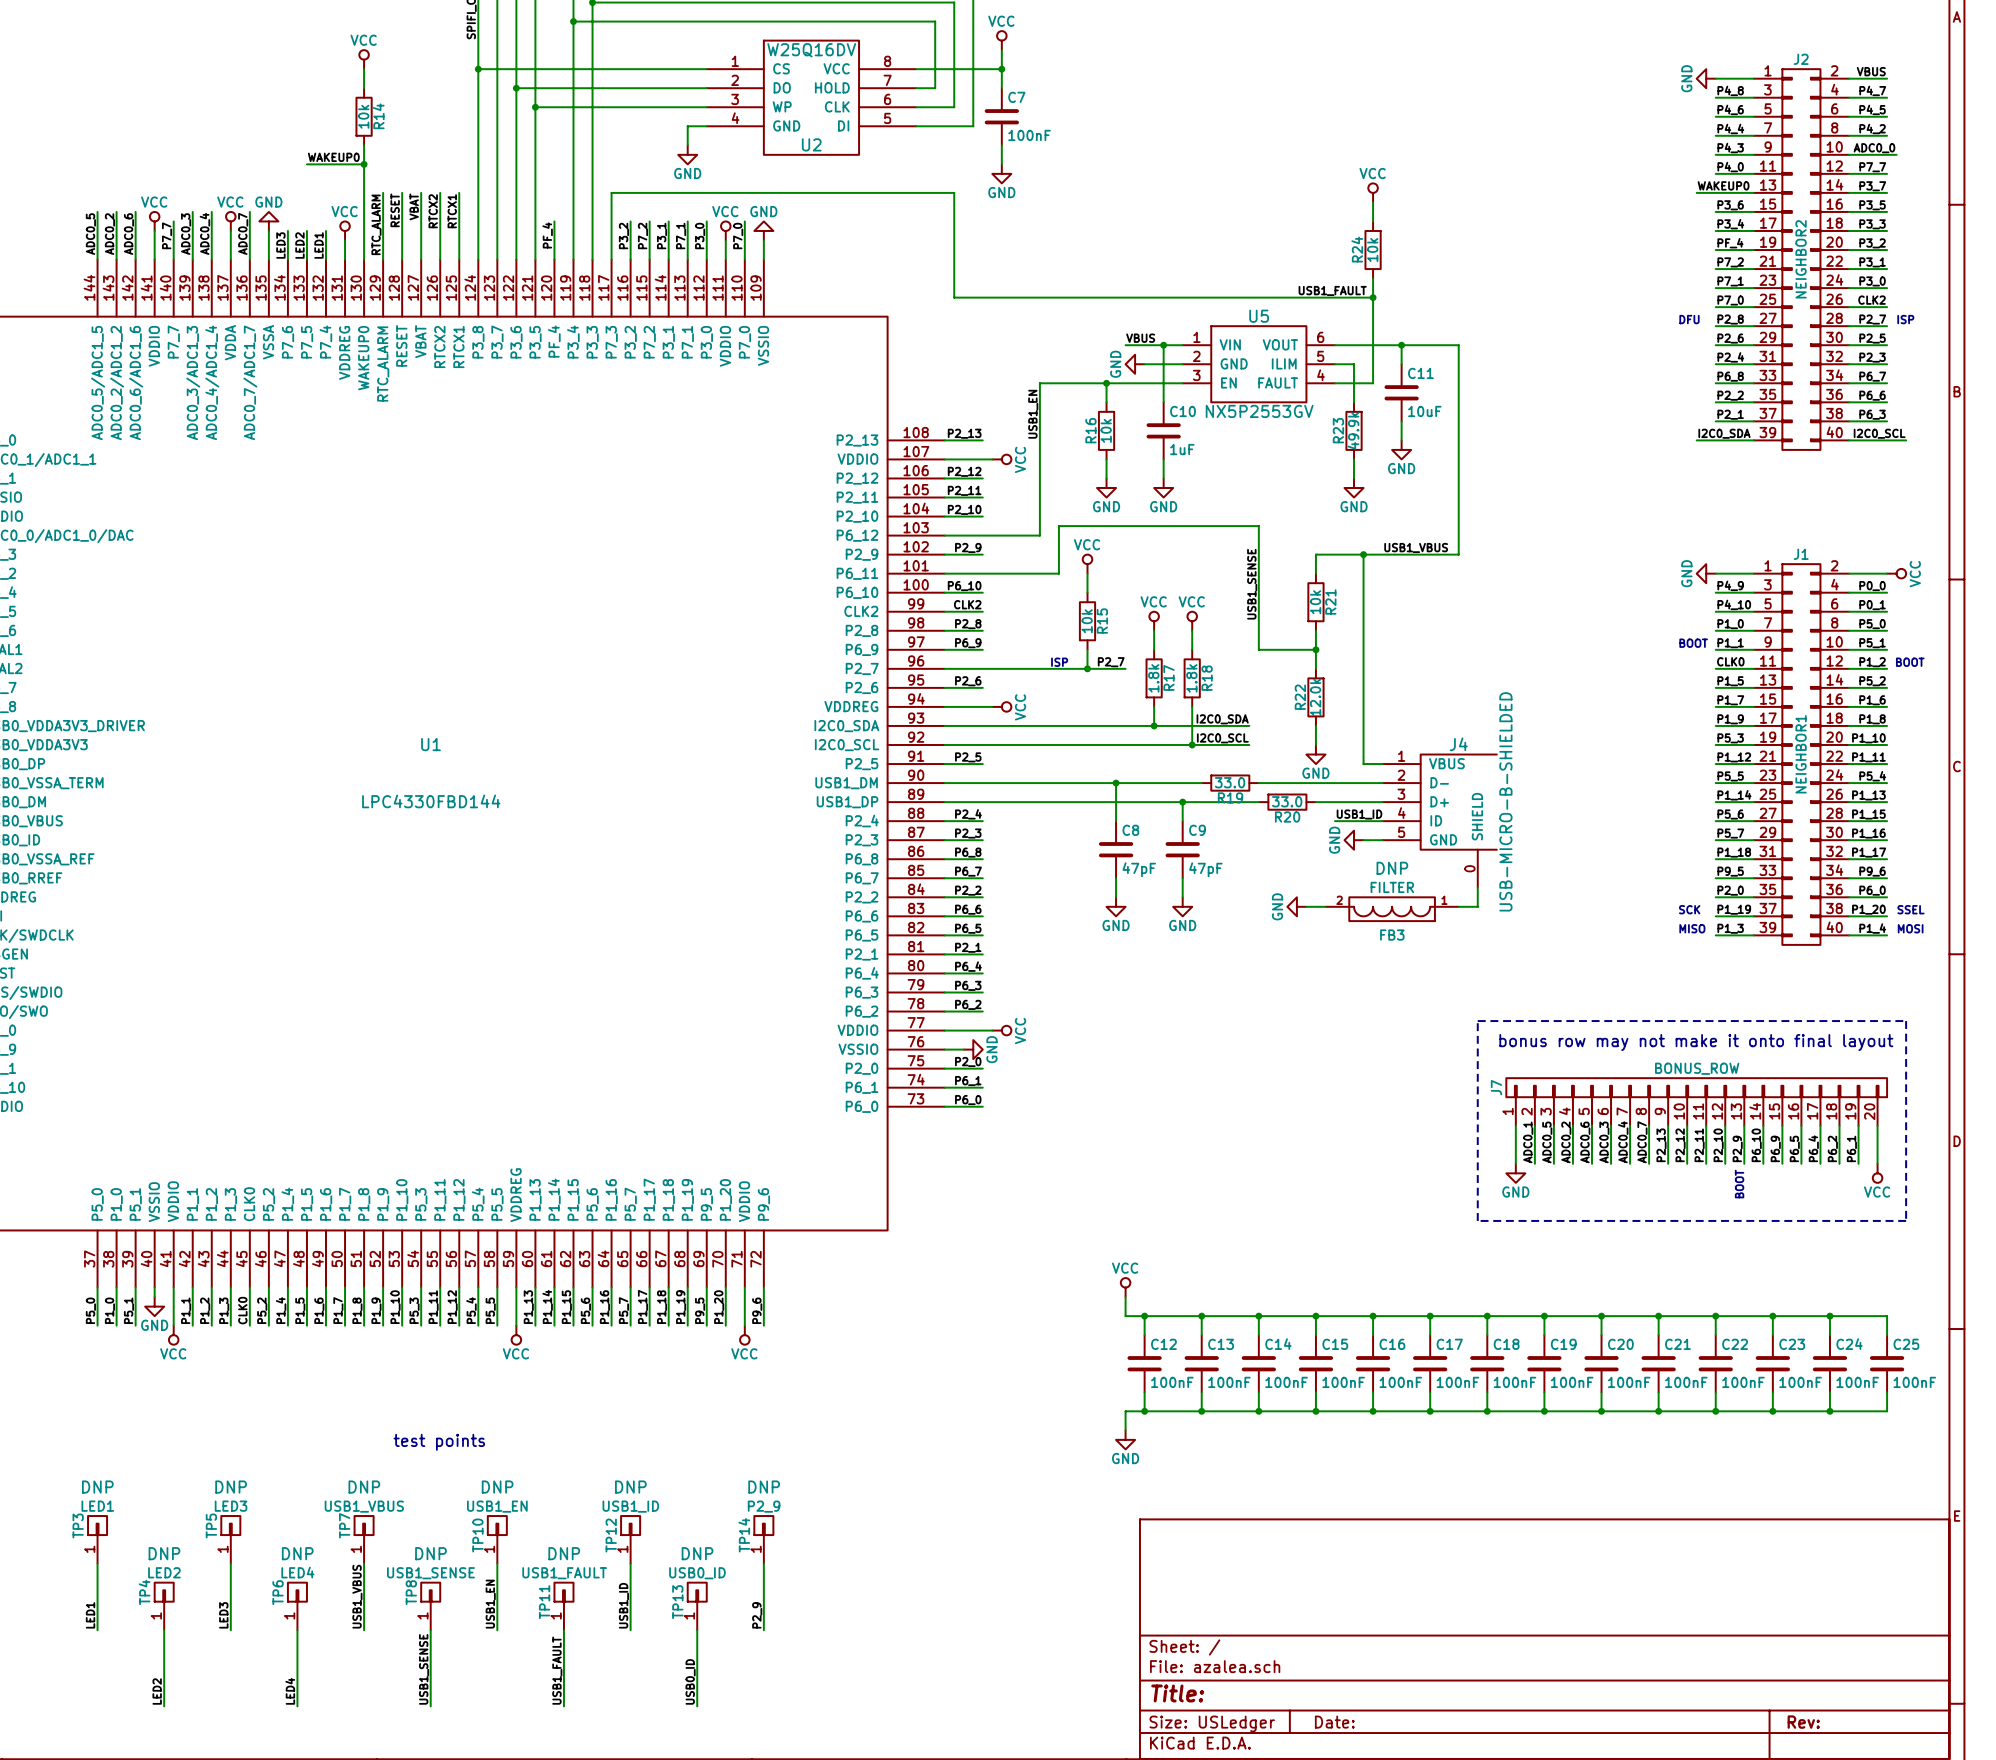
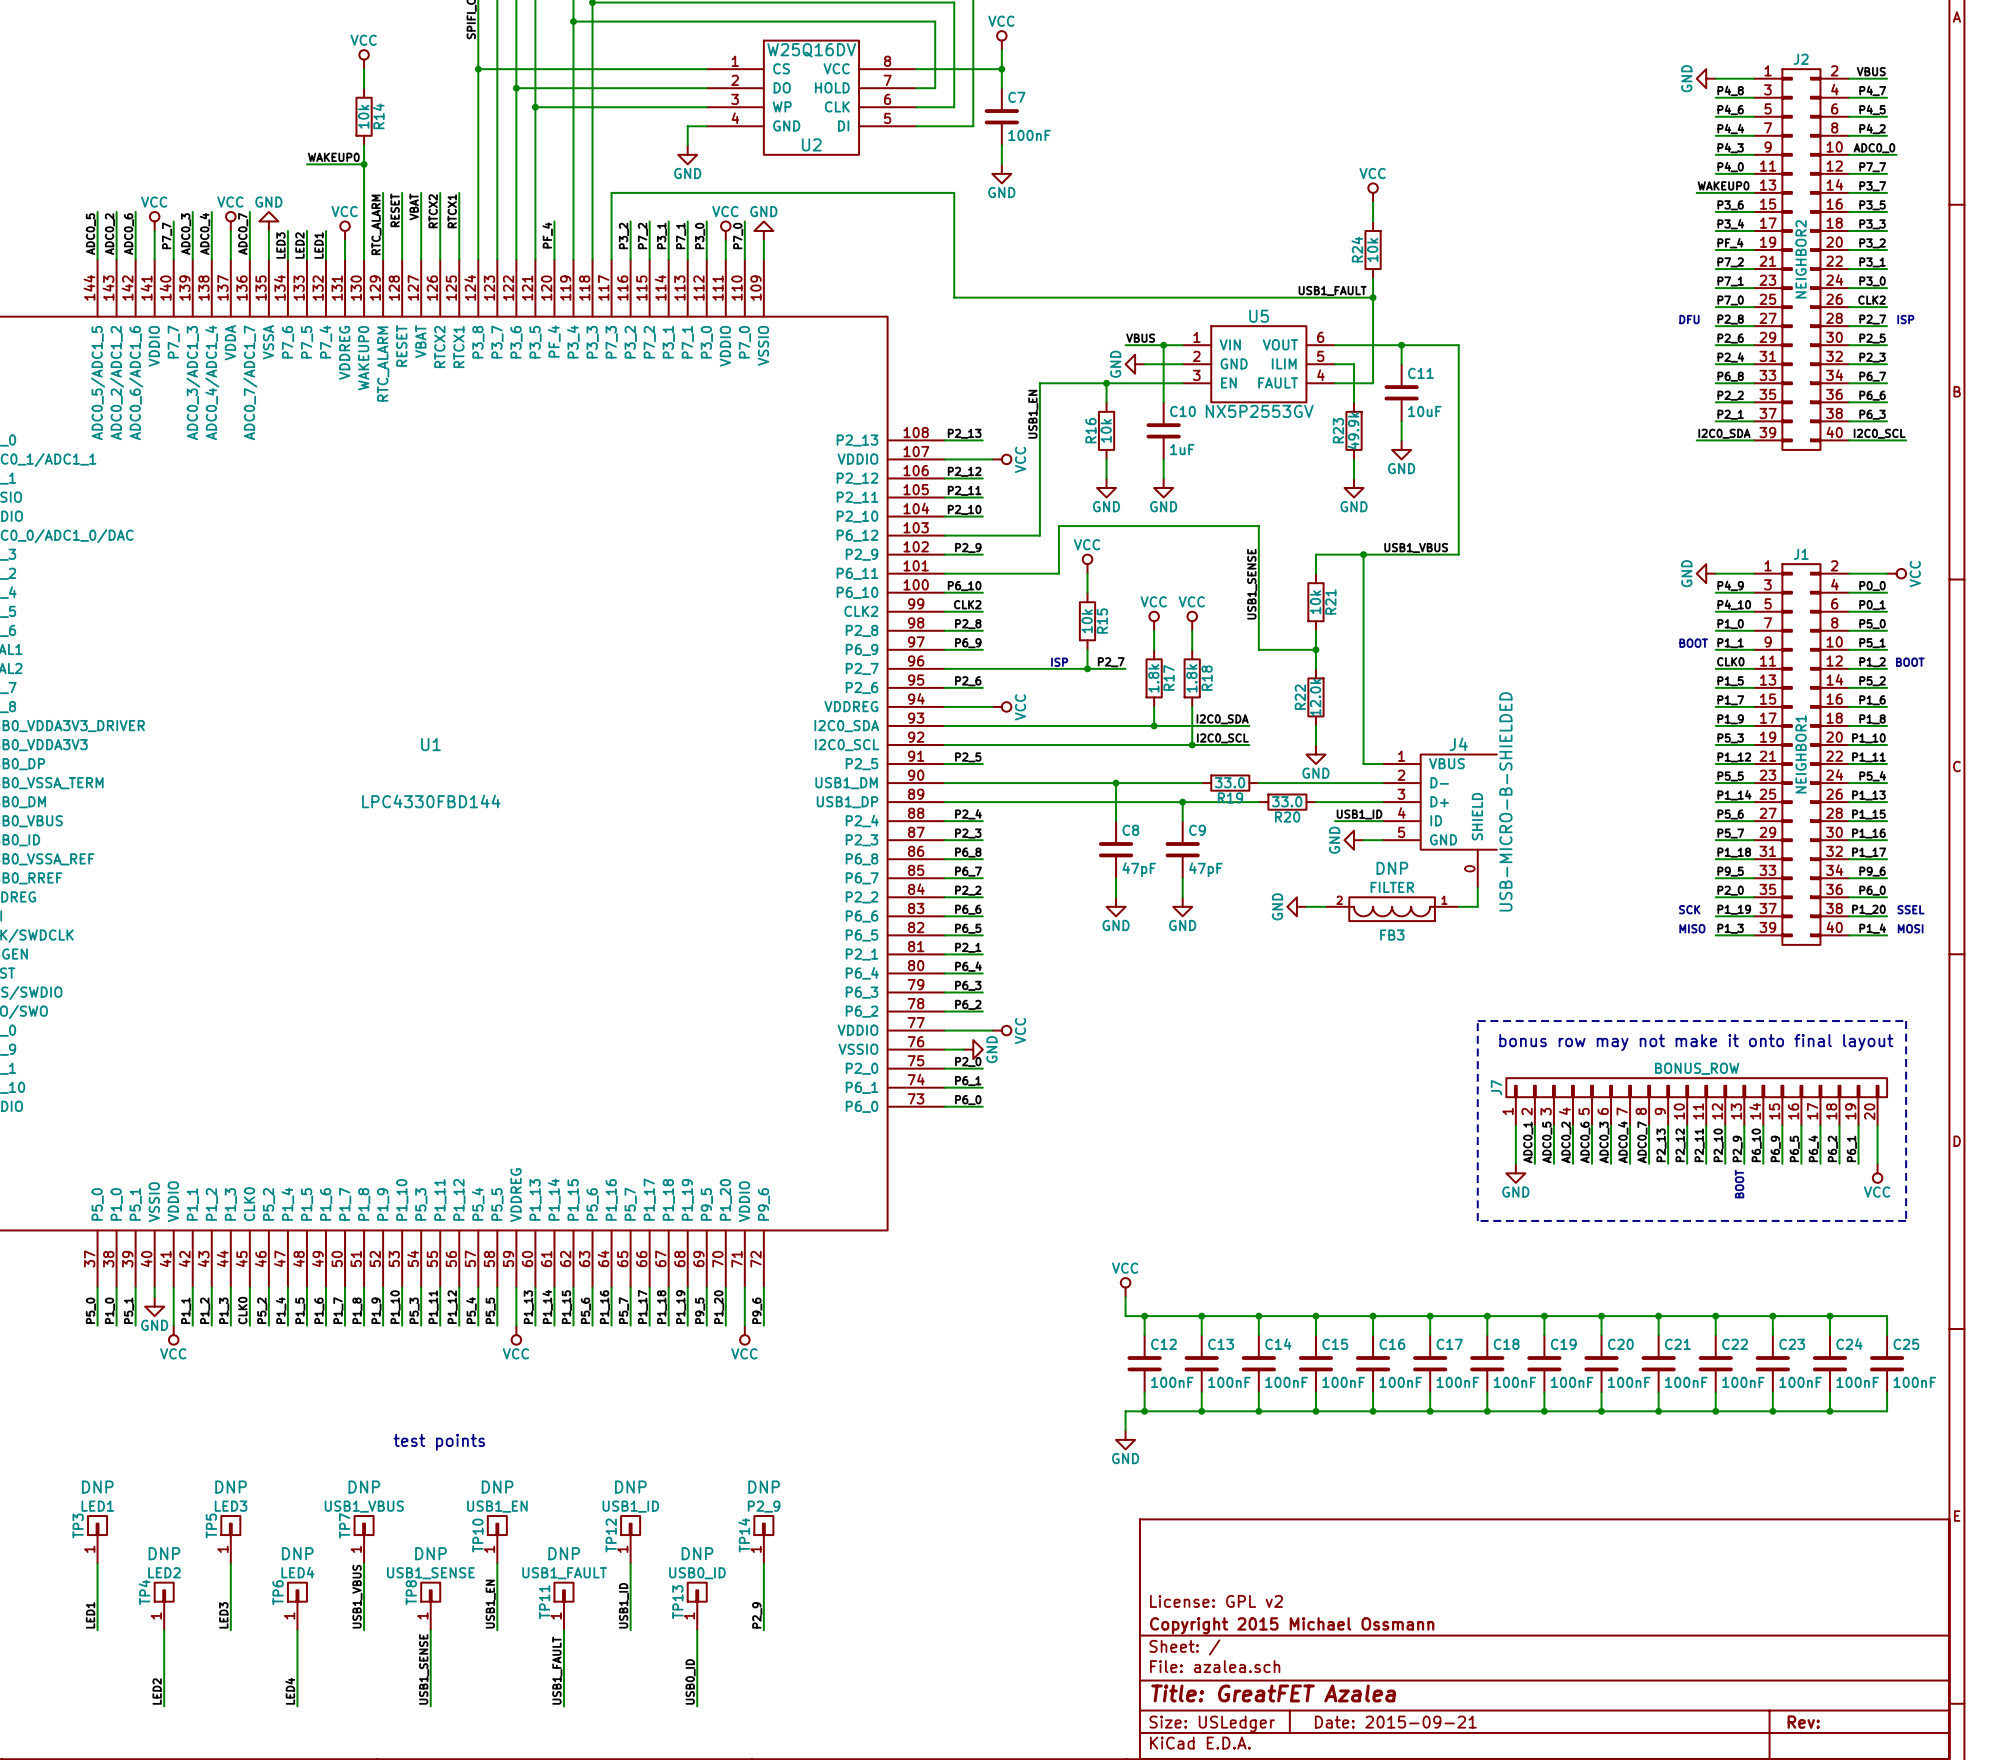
title block: none -> License: GPL v2 (1216, 1601)
title block: none -> Copyright 2015 Michael Ossmann (1292, 1625)
title block: Title: (1177, 1693) -> Title: GreatFET Azalea (1273, 1693)
title block: Date: (1334, 1722) -> Date: 2015-09-21 (1395, 1722)

